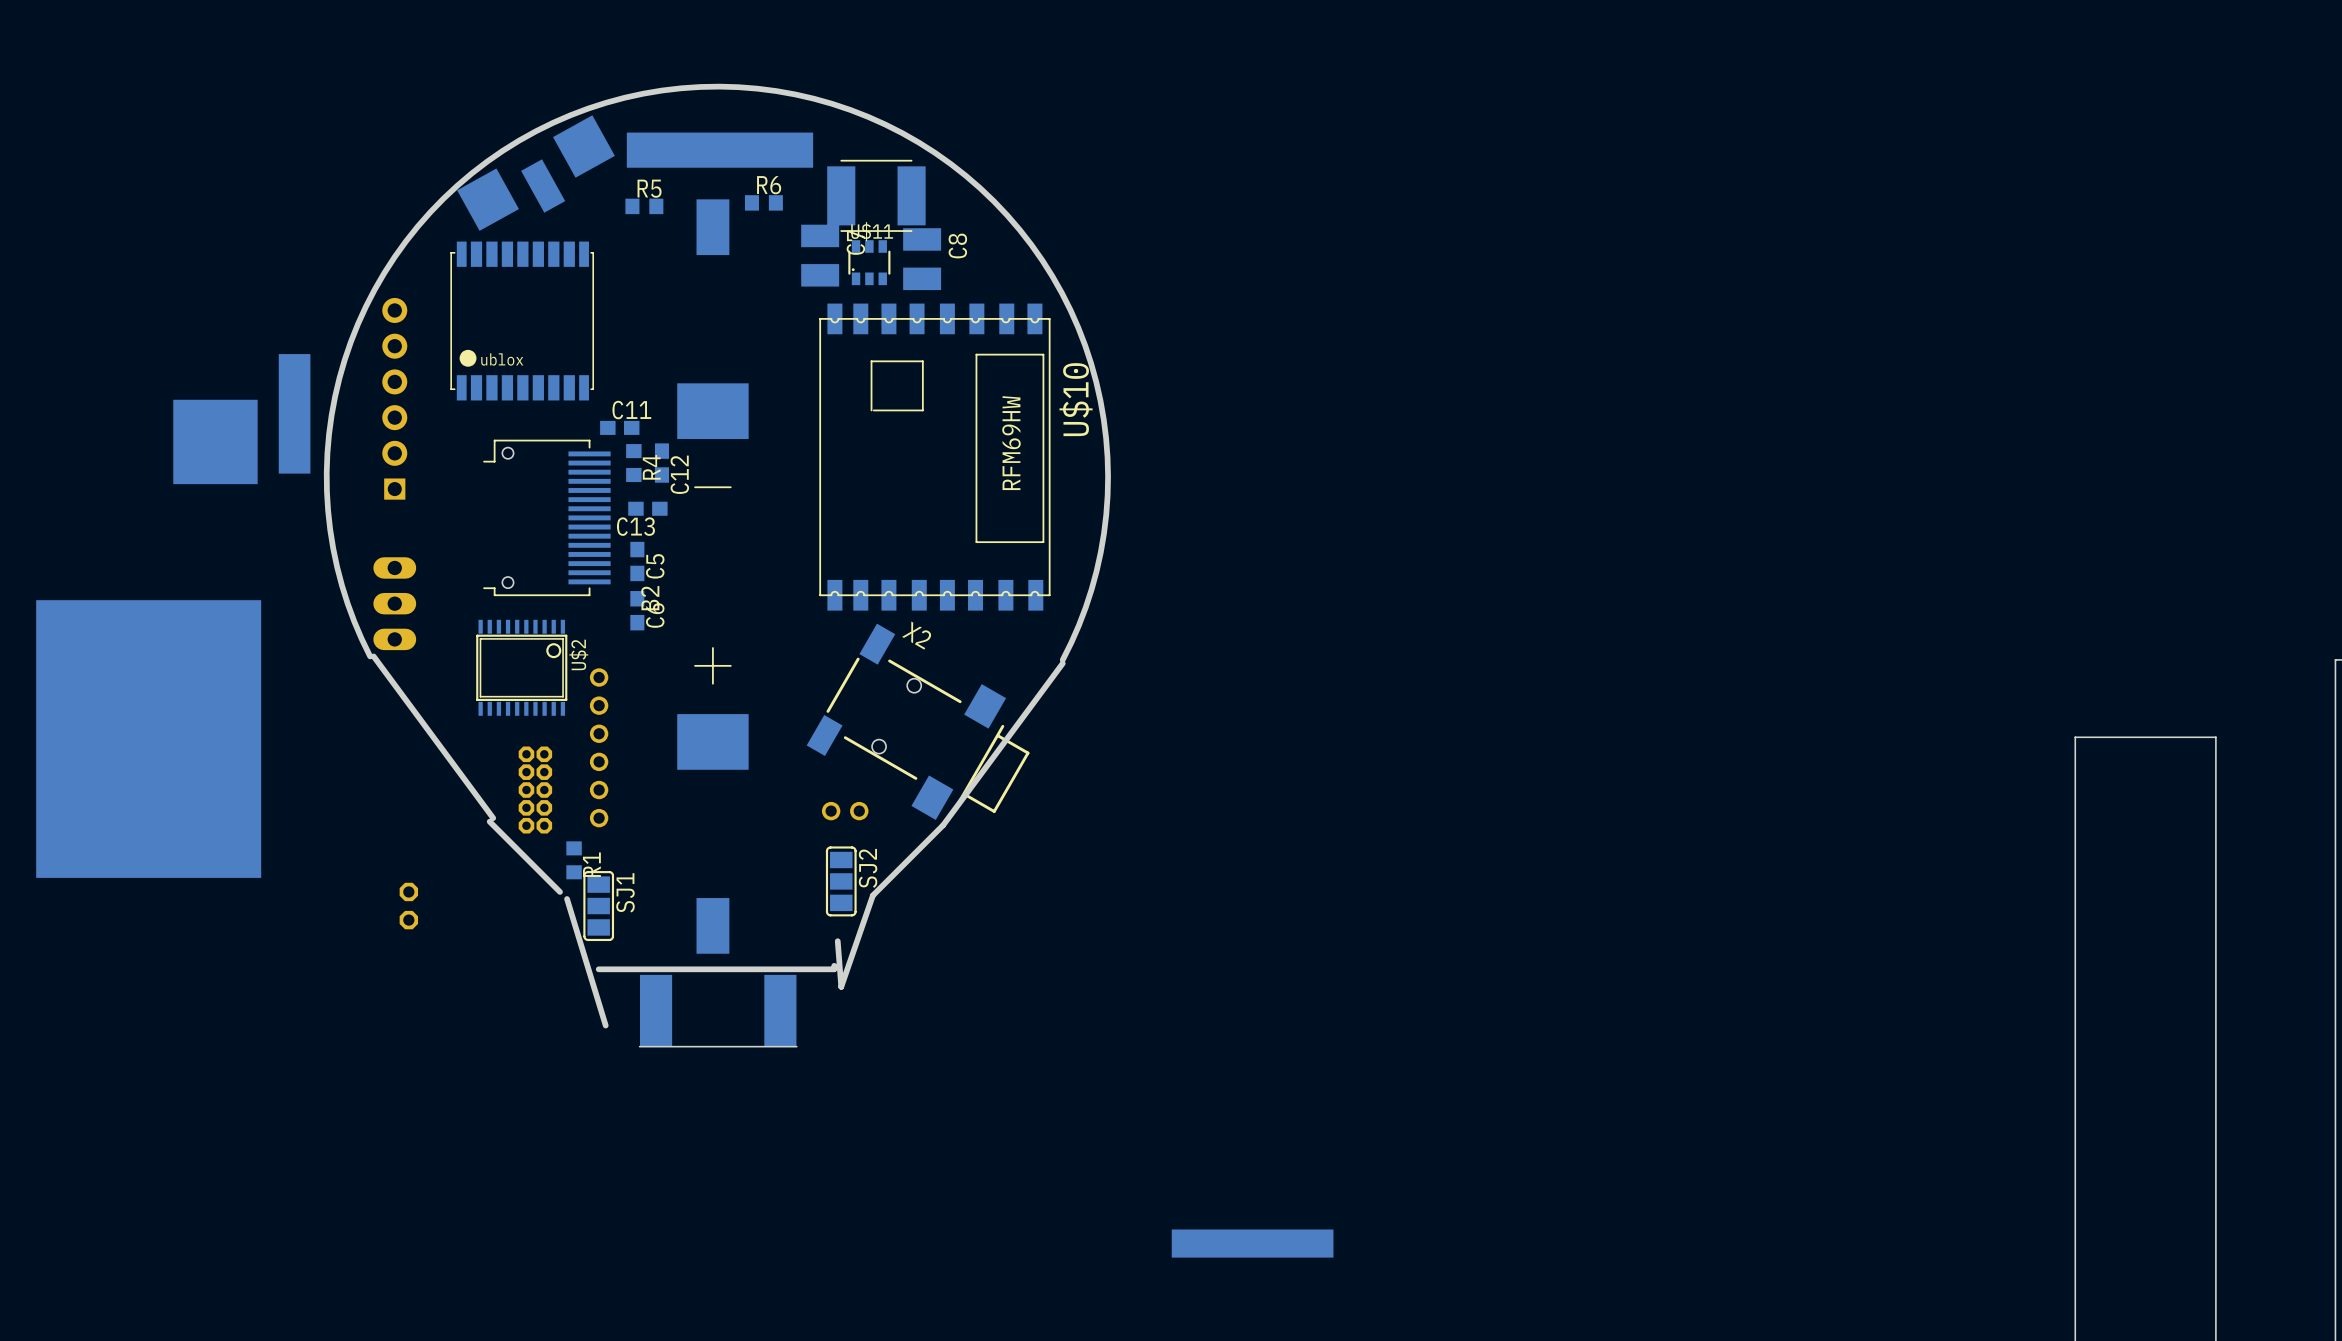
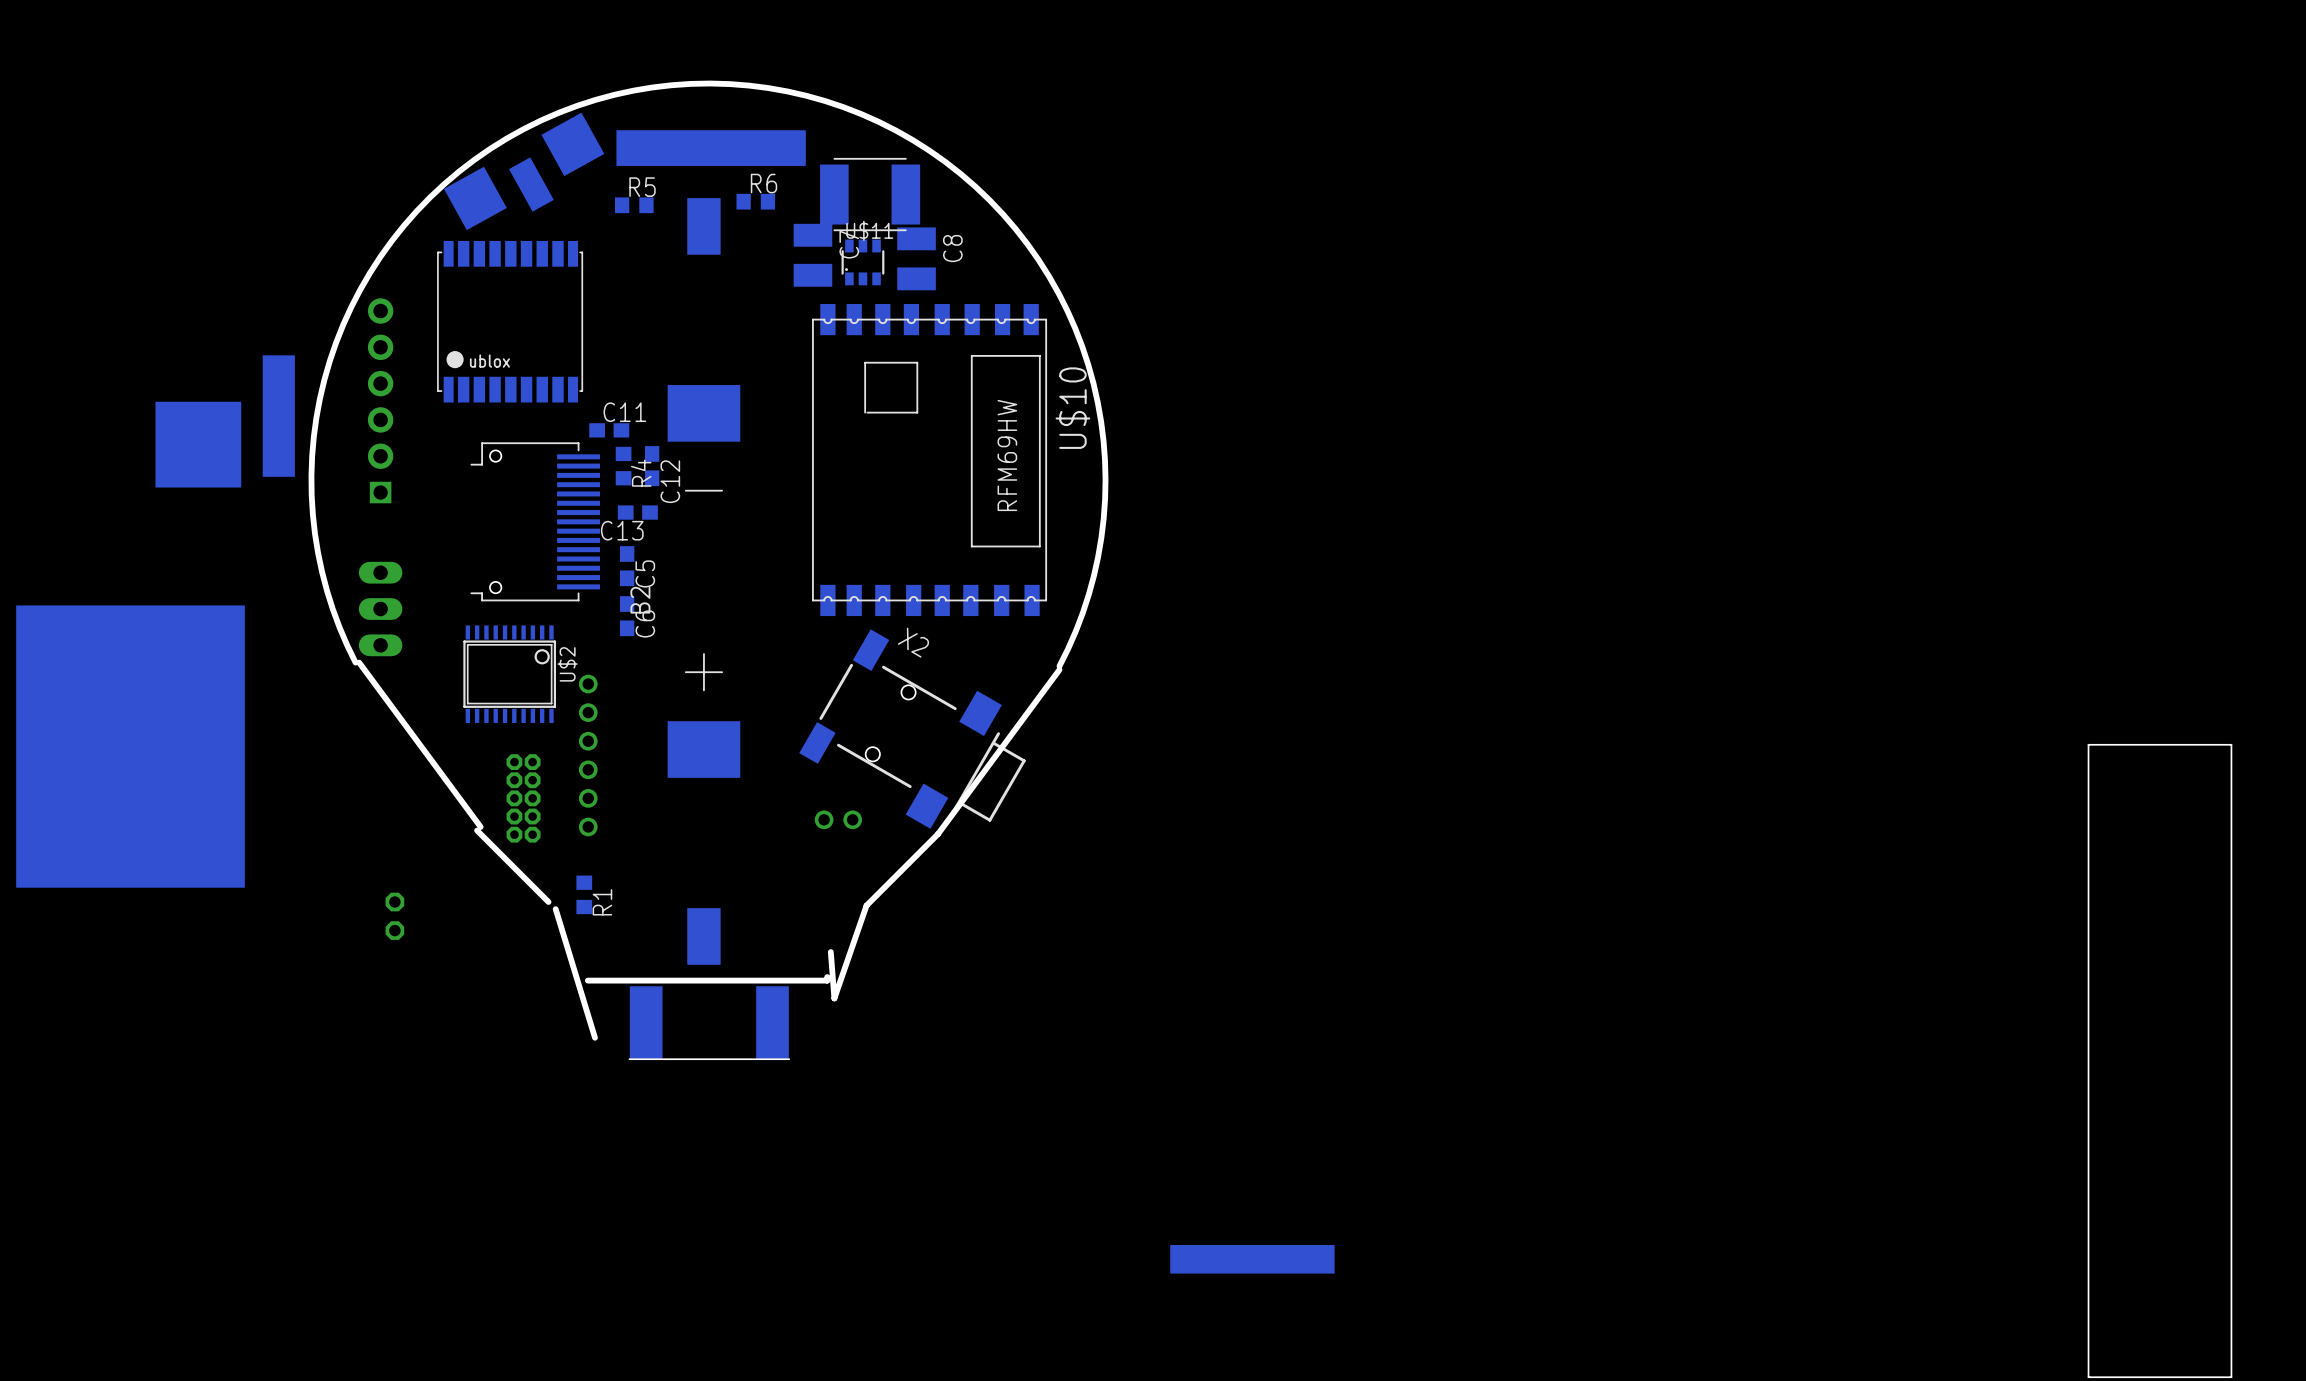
R1 position: (574, 860) -> (584, 894)
SJ2: (841, 881) -> none
SJ1: (598, 906) -> none

